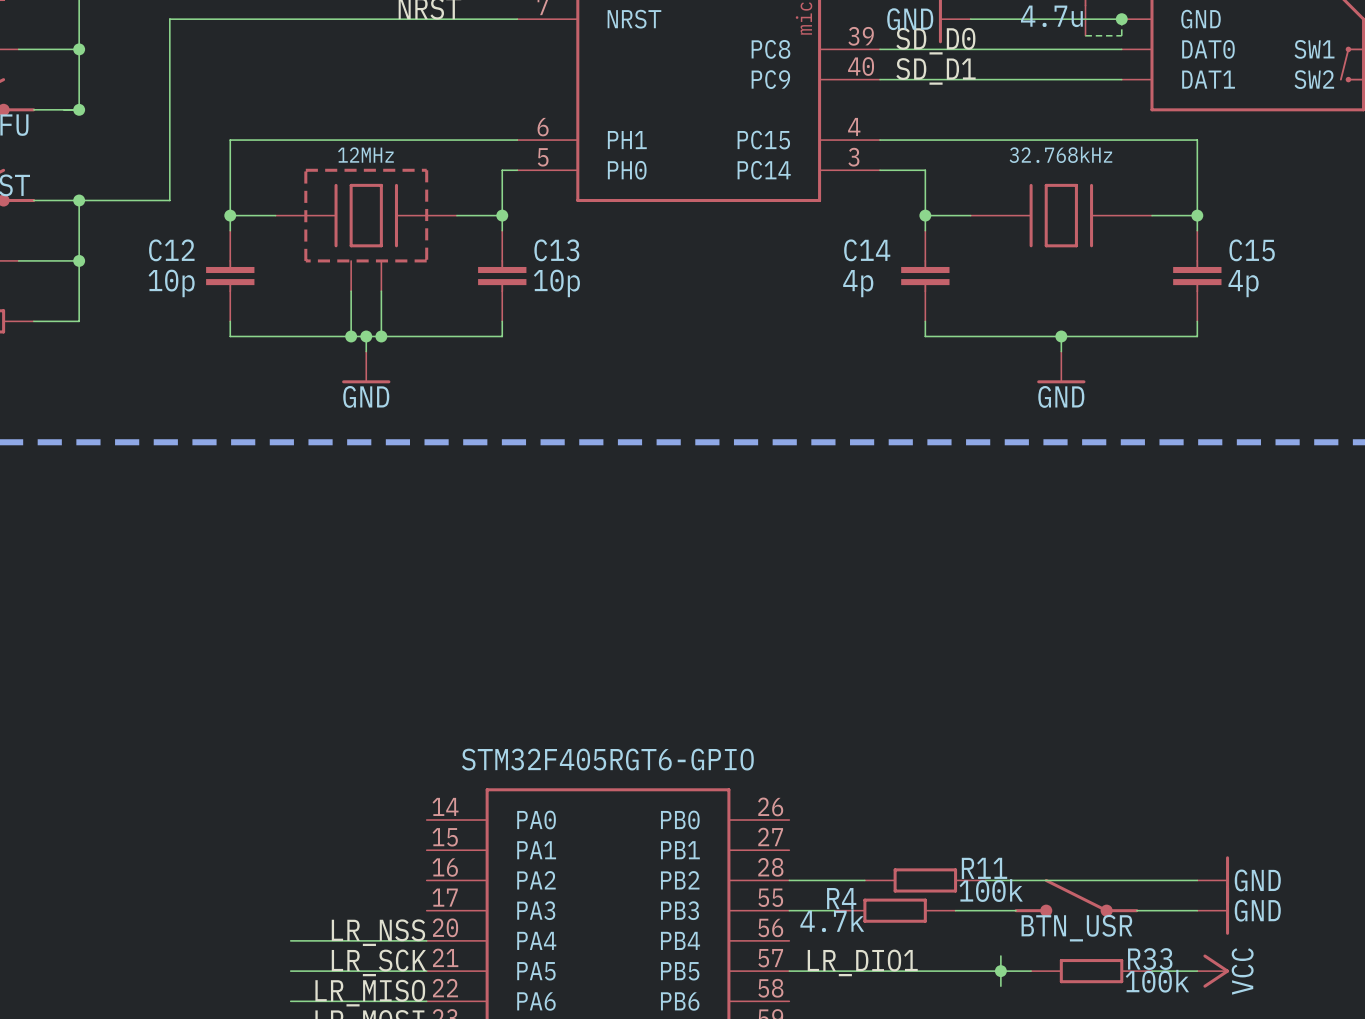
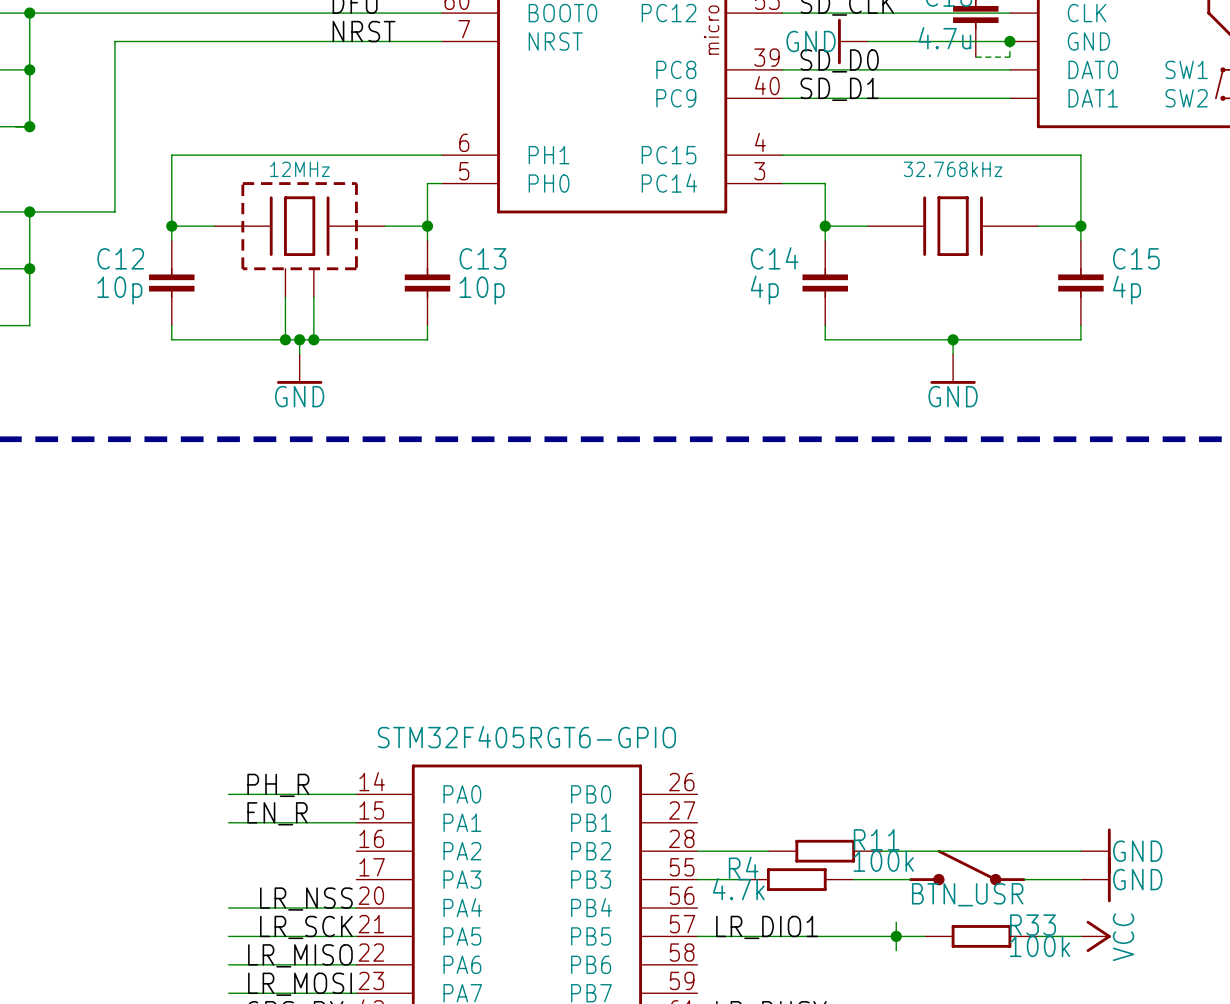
label: none -> PH_R (278, 785)
wire: none -> (228, 794) (356, 794)
label: none -> EN_R (277, 813)
wire: none -> (228, 822) (356, 822)

